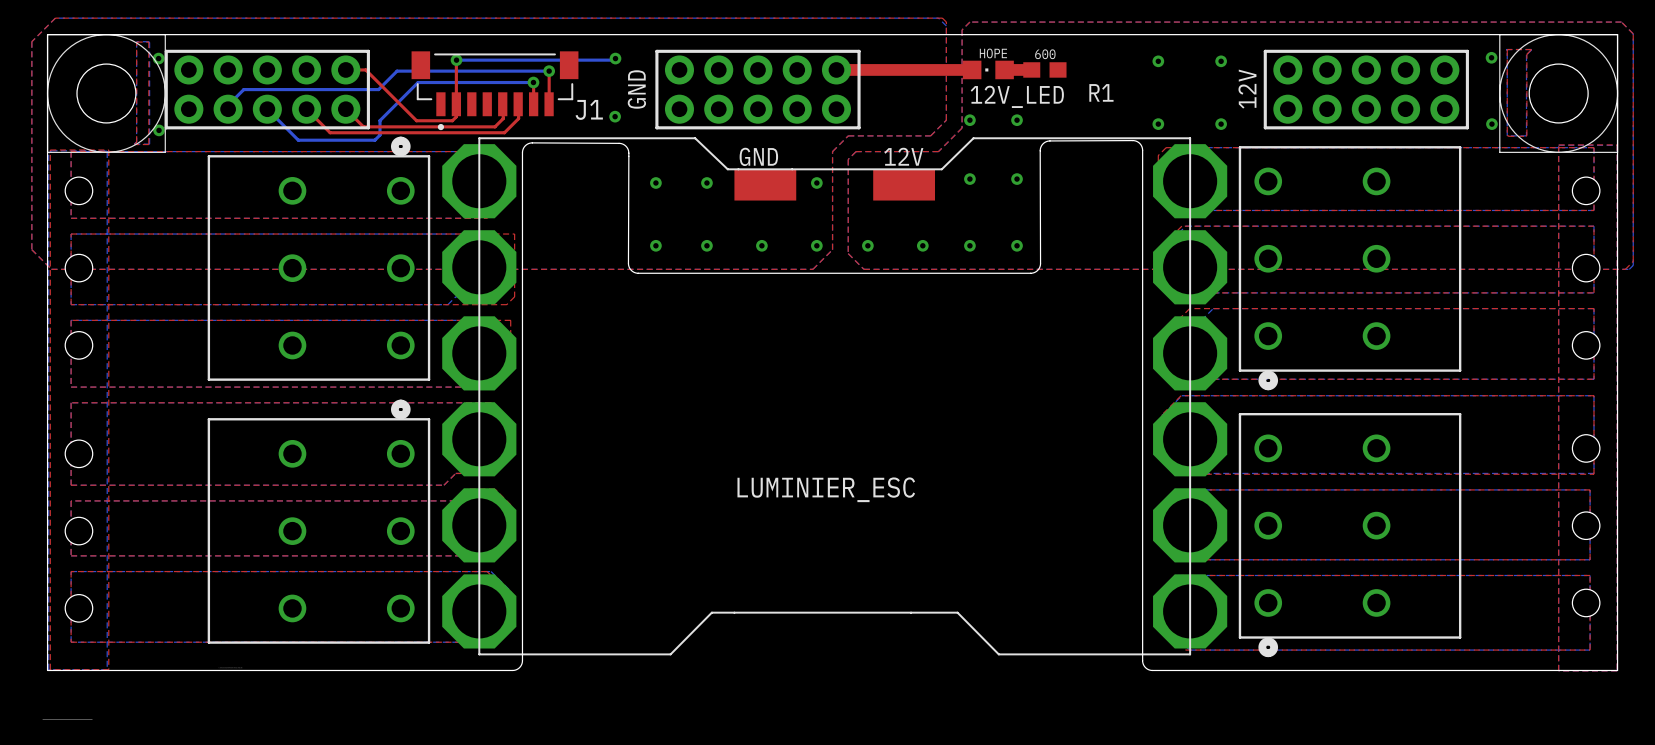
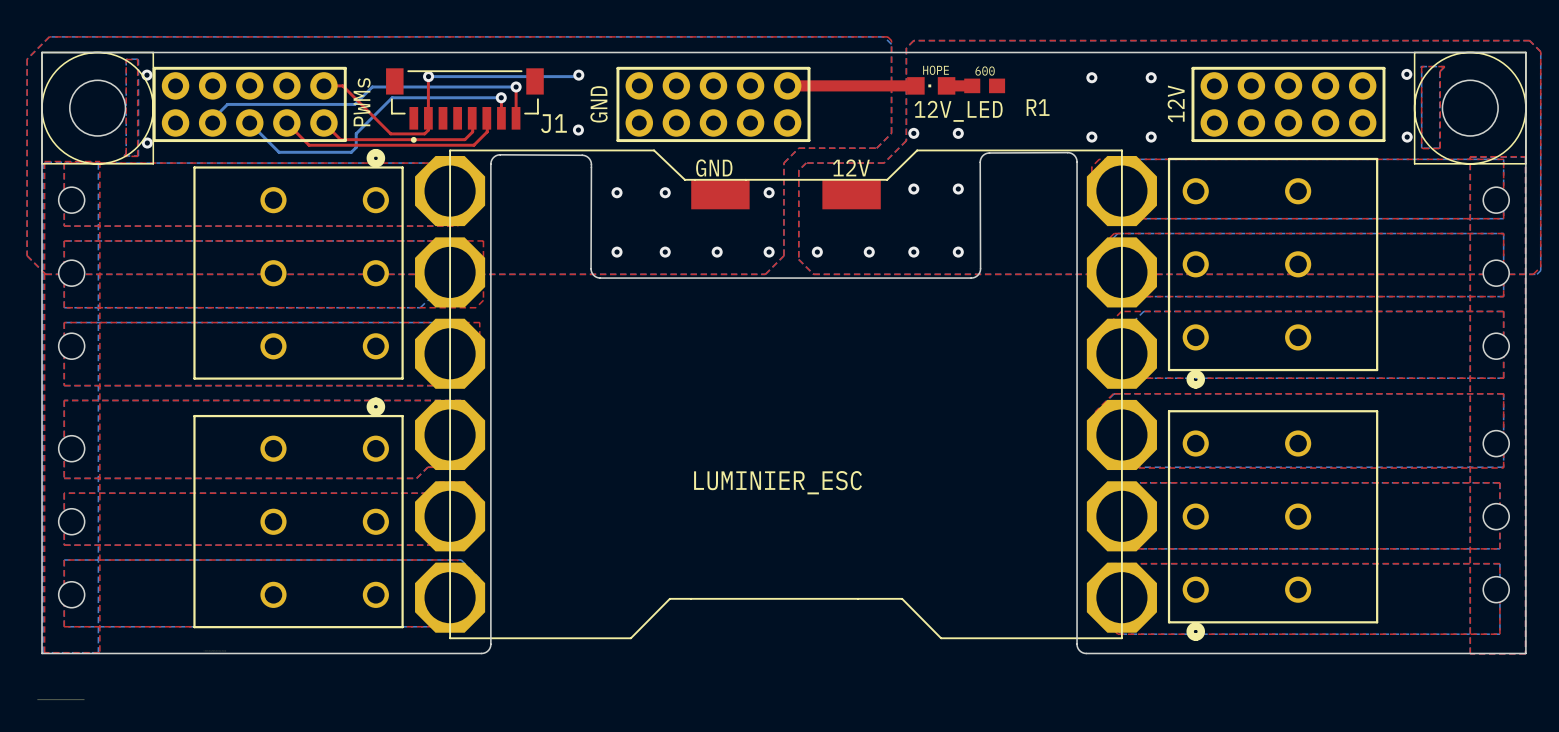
text: none -> PWMs (362, 102)

